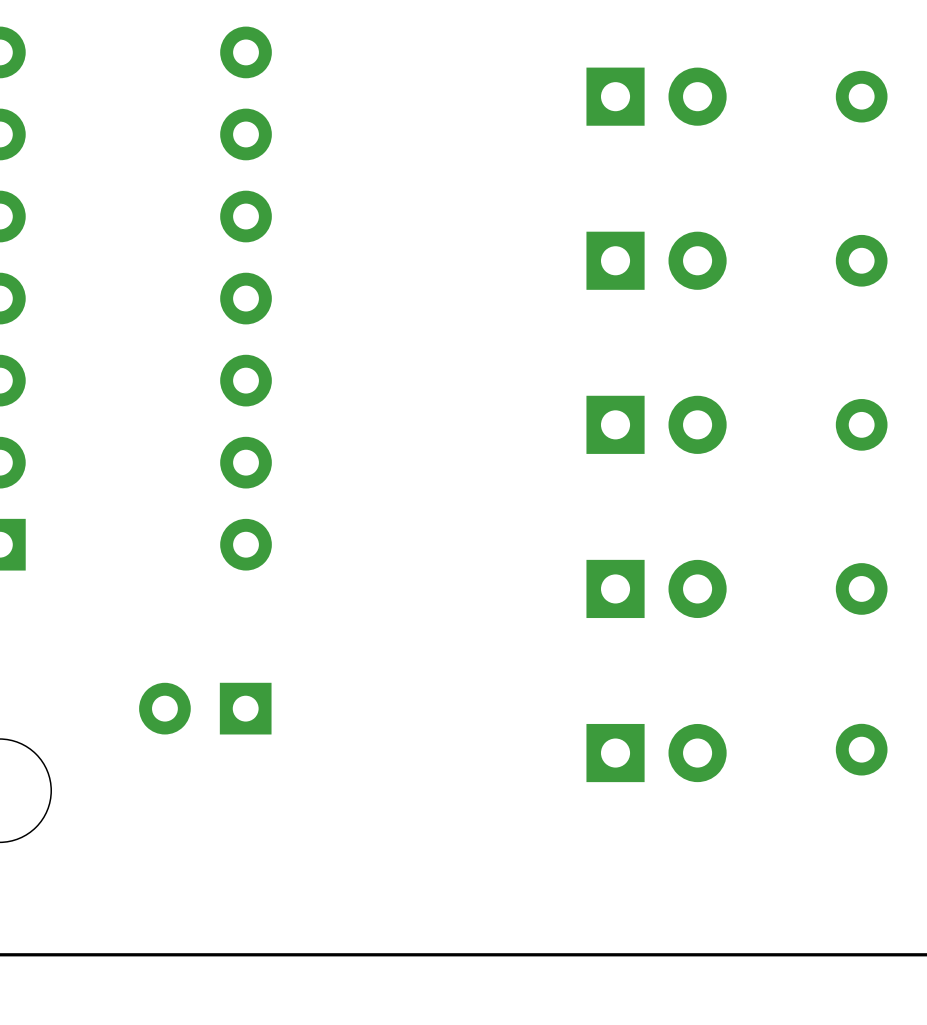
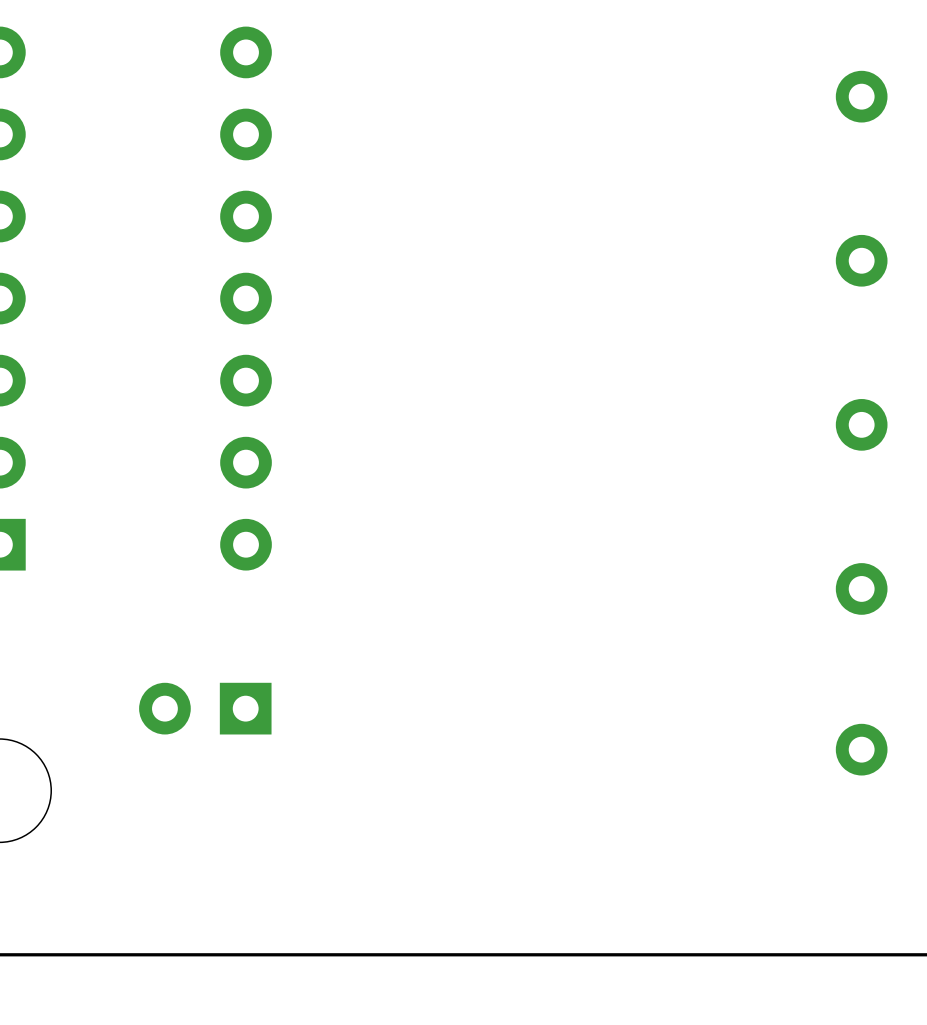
part: (656, 96) -> none
part: (656, 260) -> none
part: (656, 424) -> none
part: (656, 588) -> none
part: (656, 753) -> none

